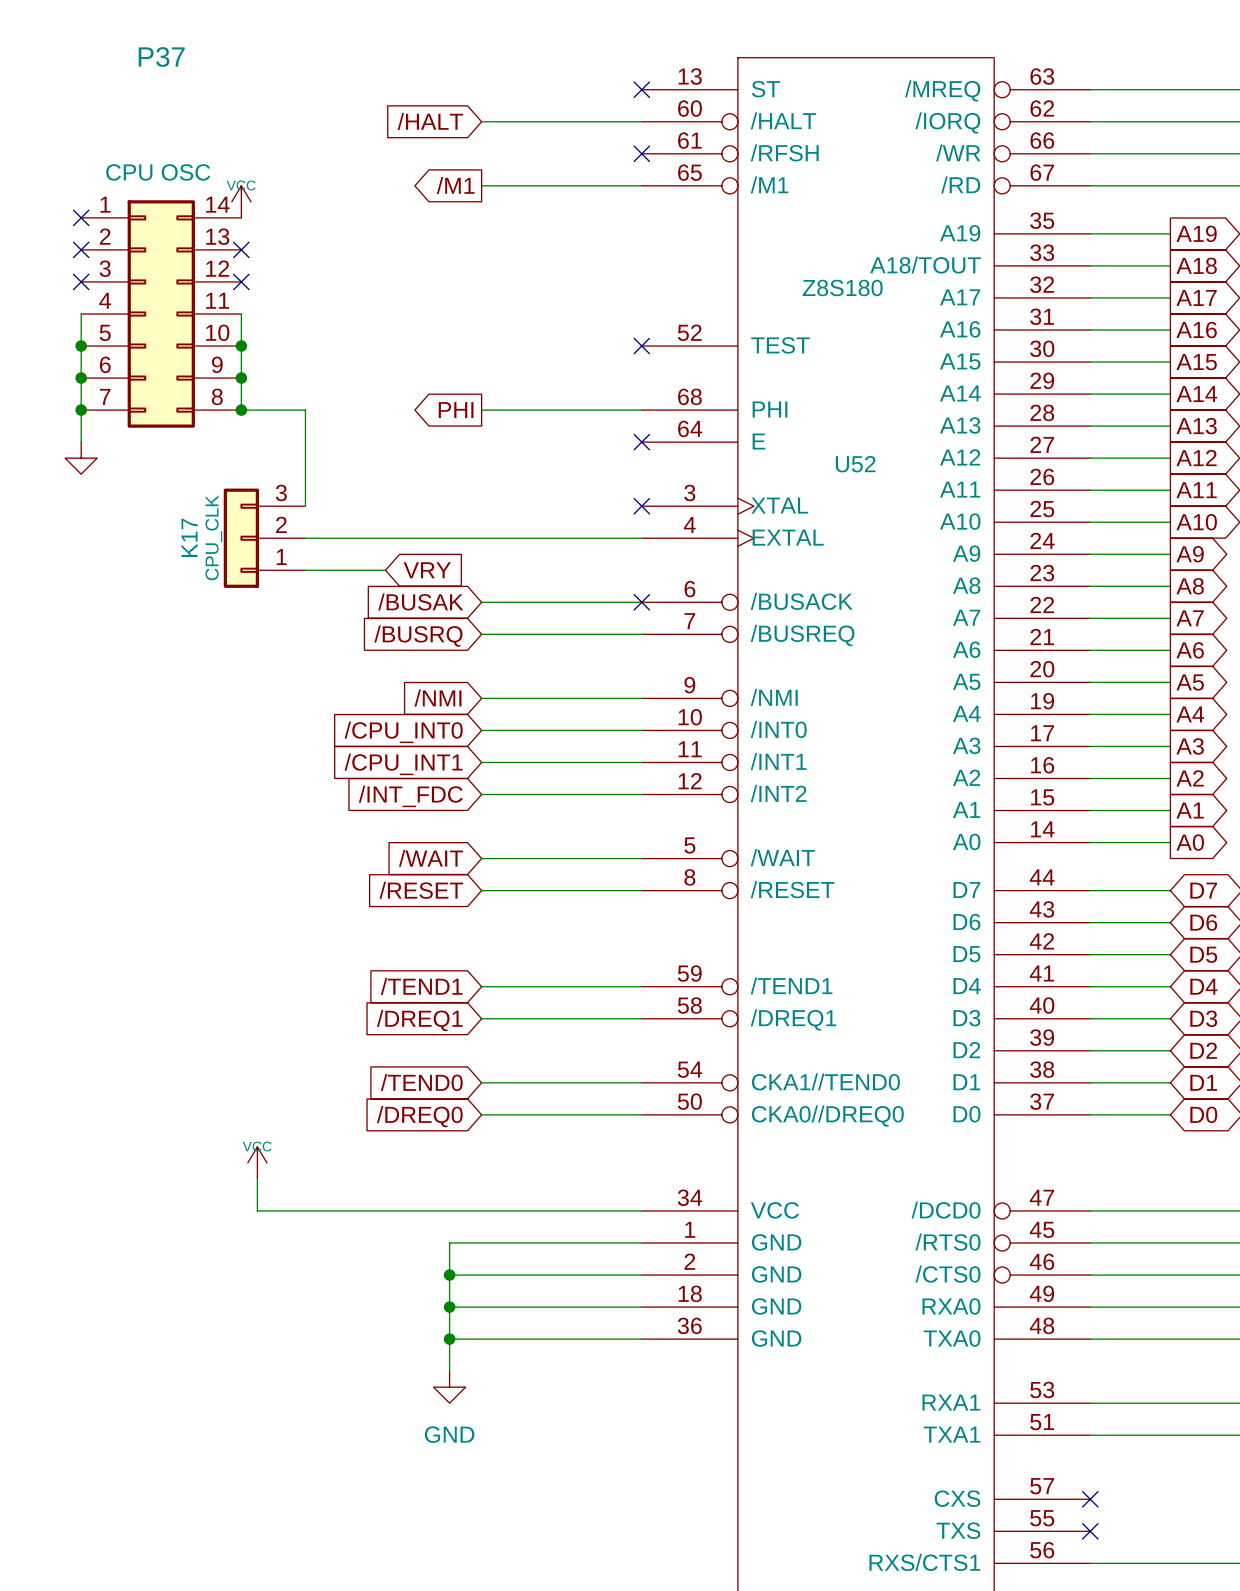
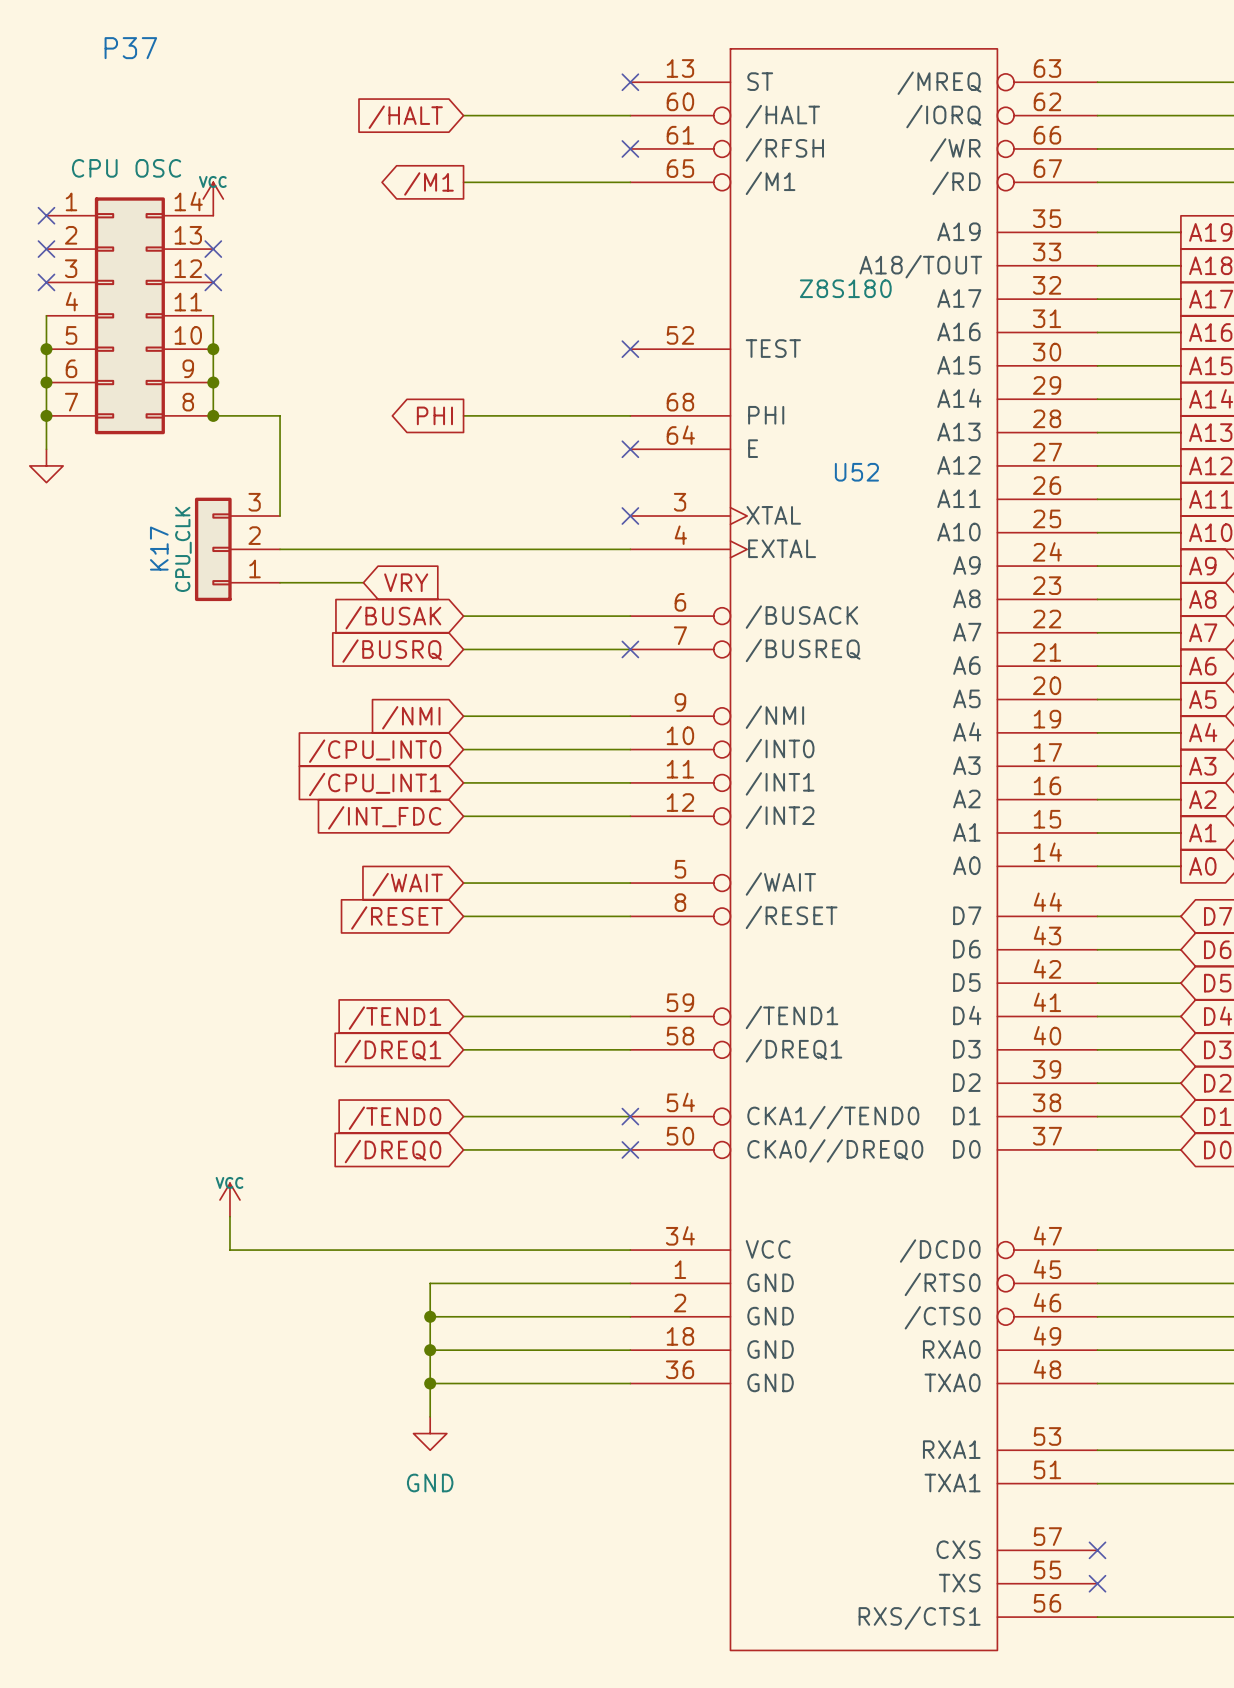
no-connect mark position: (641, 602) -> (630, 649)
no-connect mark: none -> (630, 1116)
no-connect mark: none -> (630, 1149)

